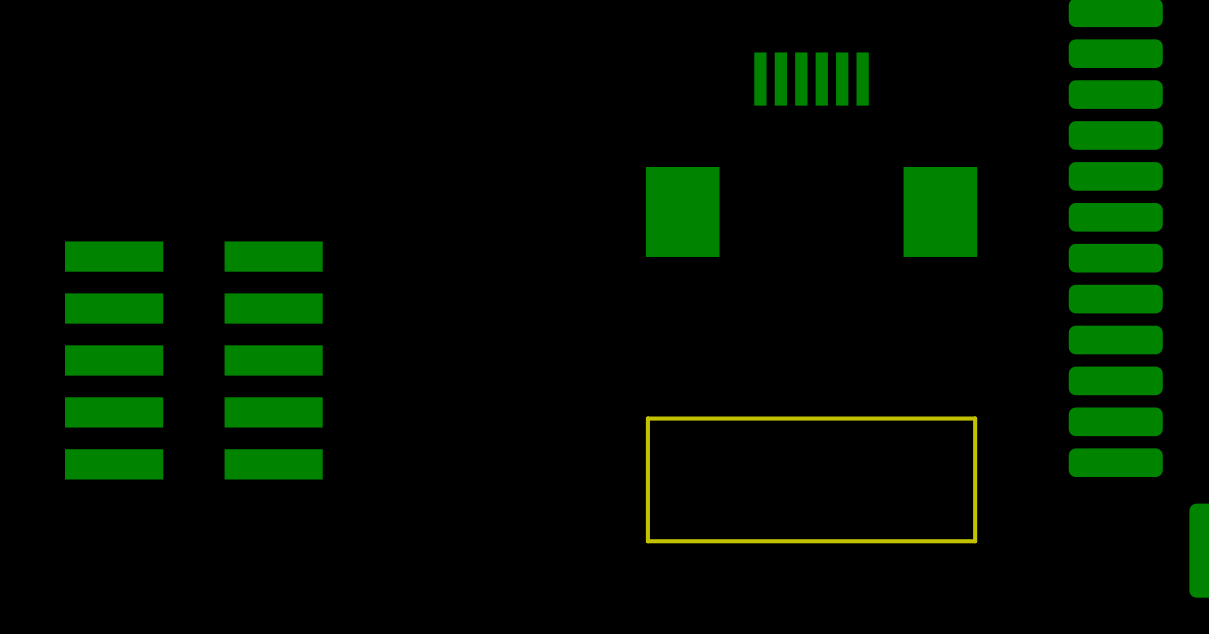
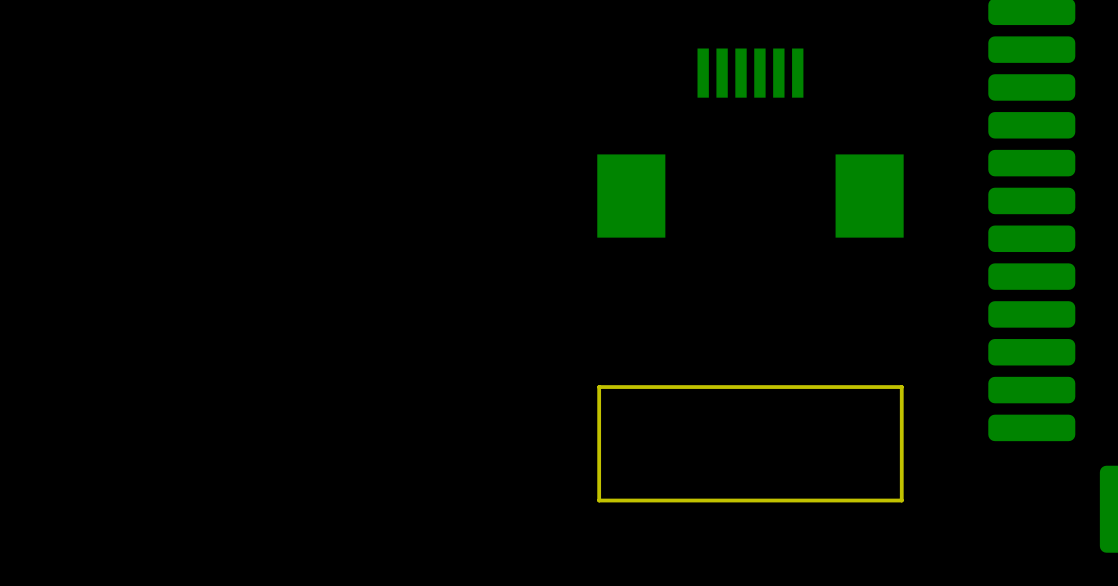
part: (193, 360) -> none

